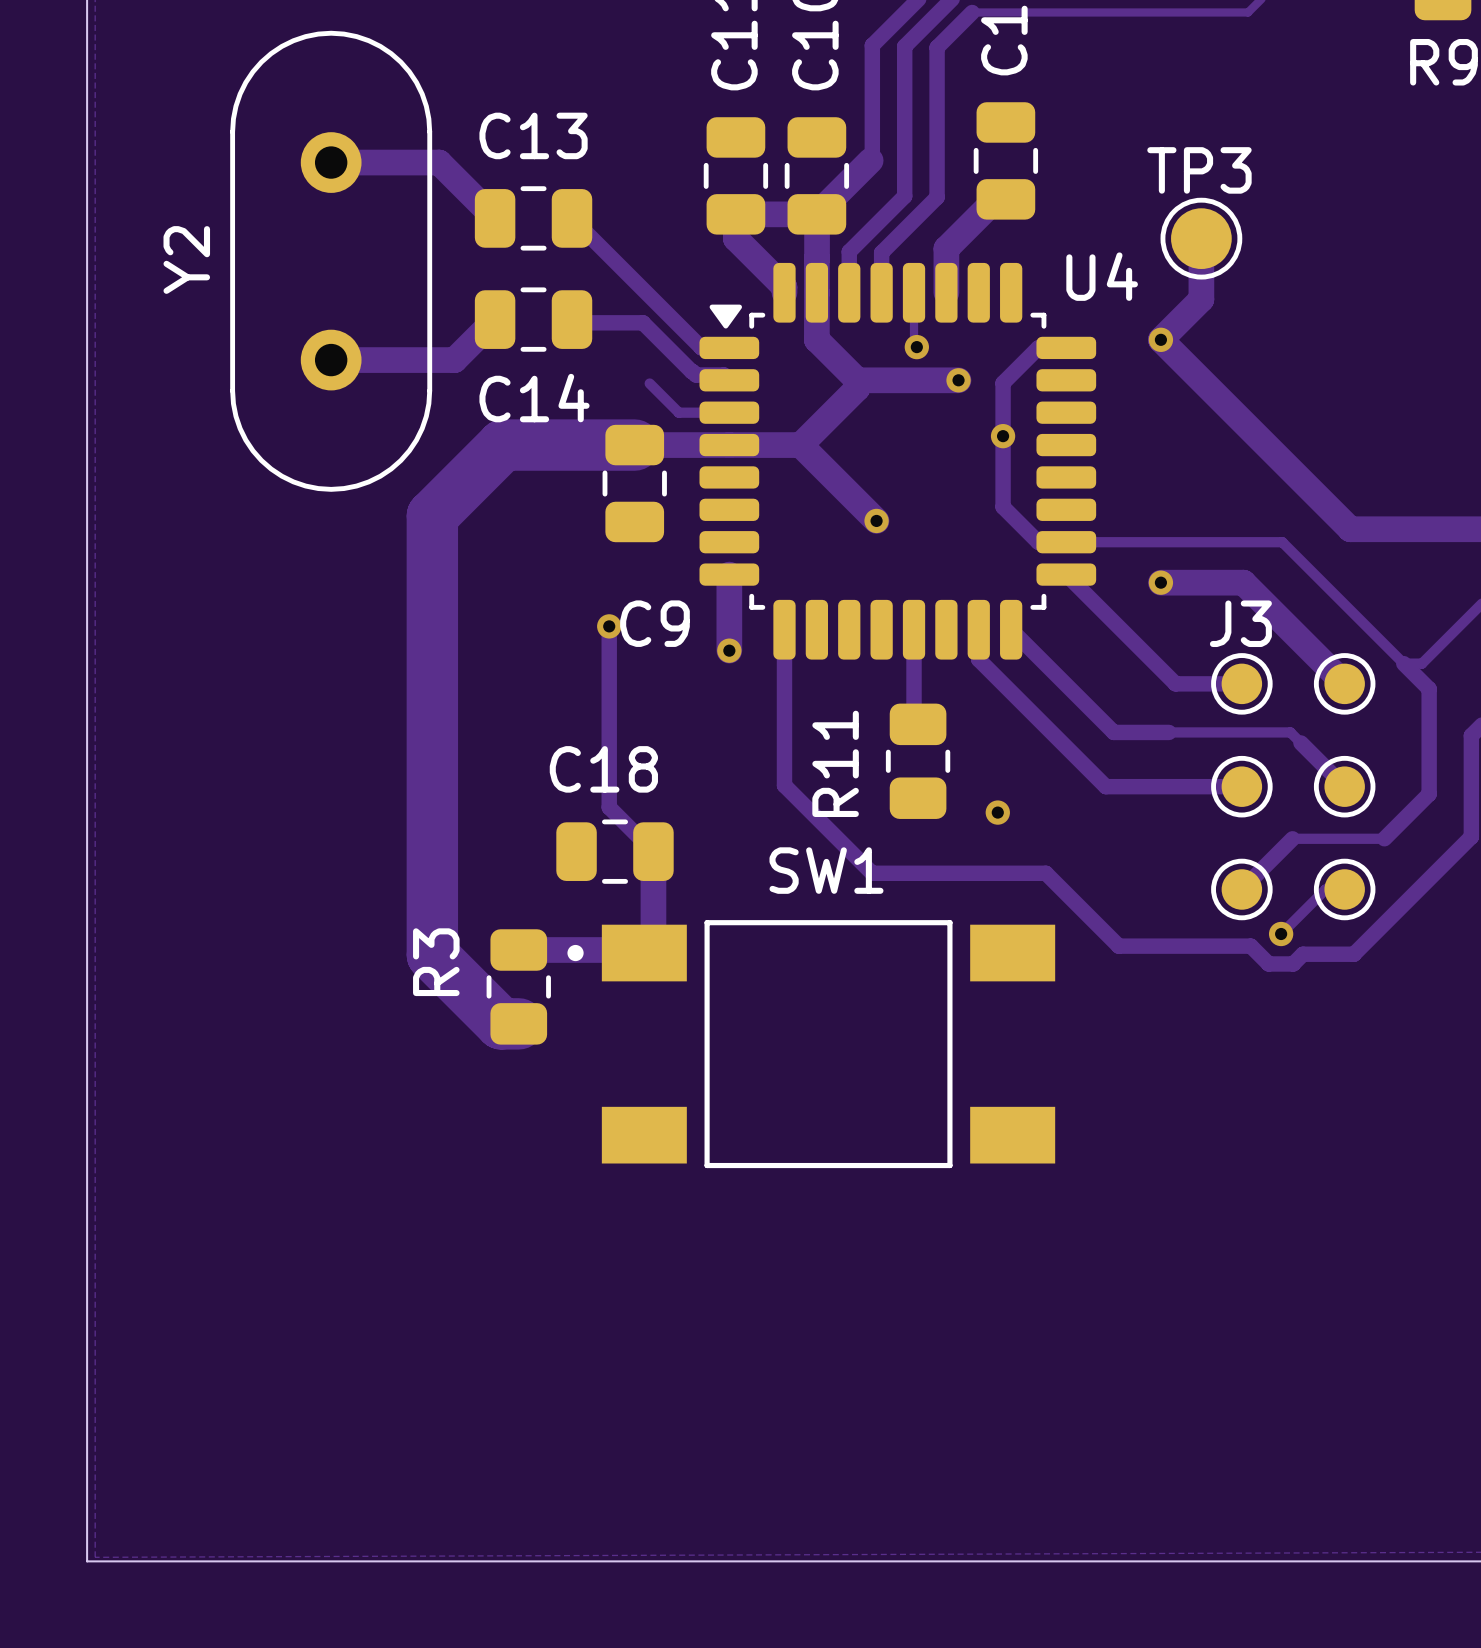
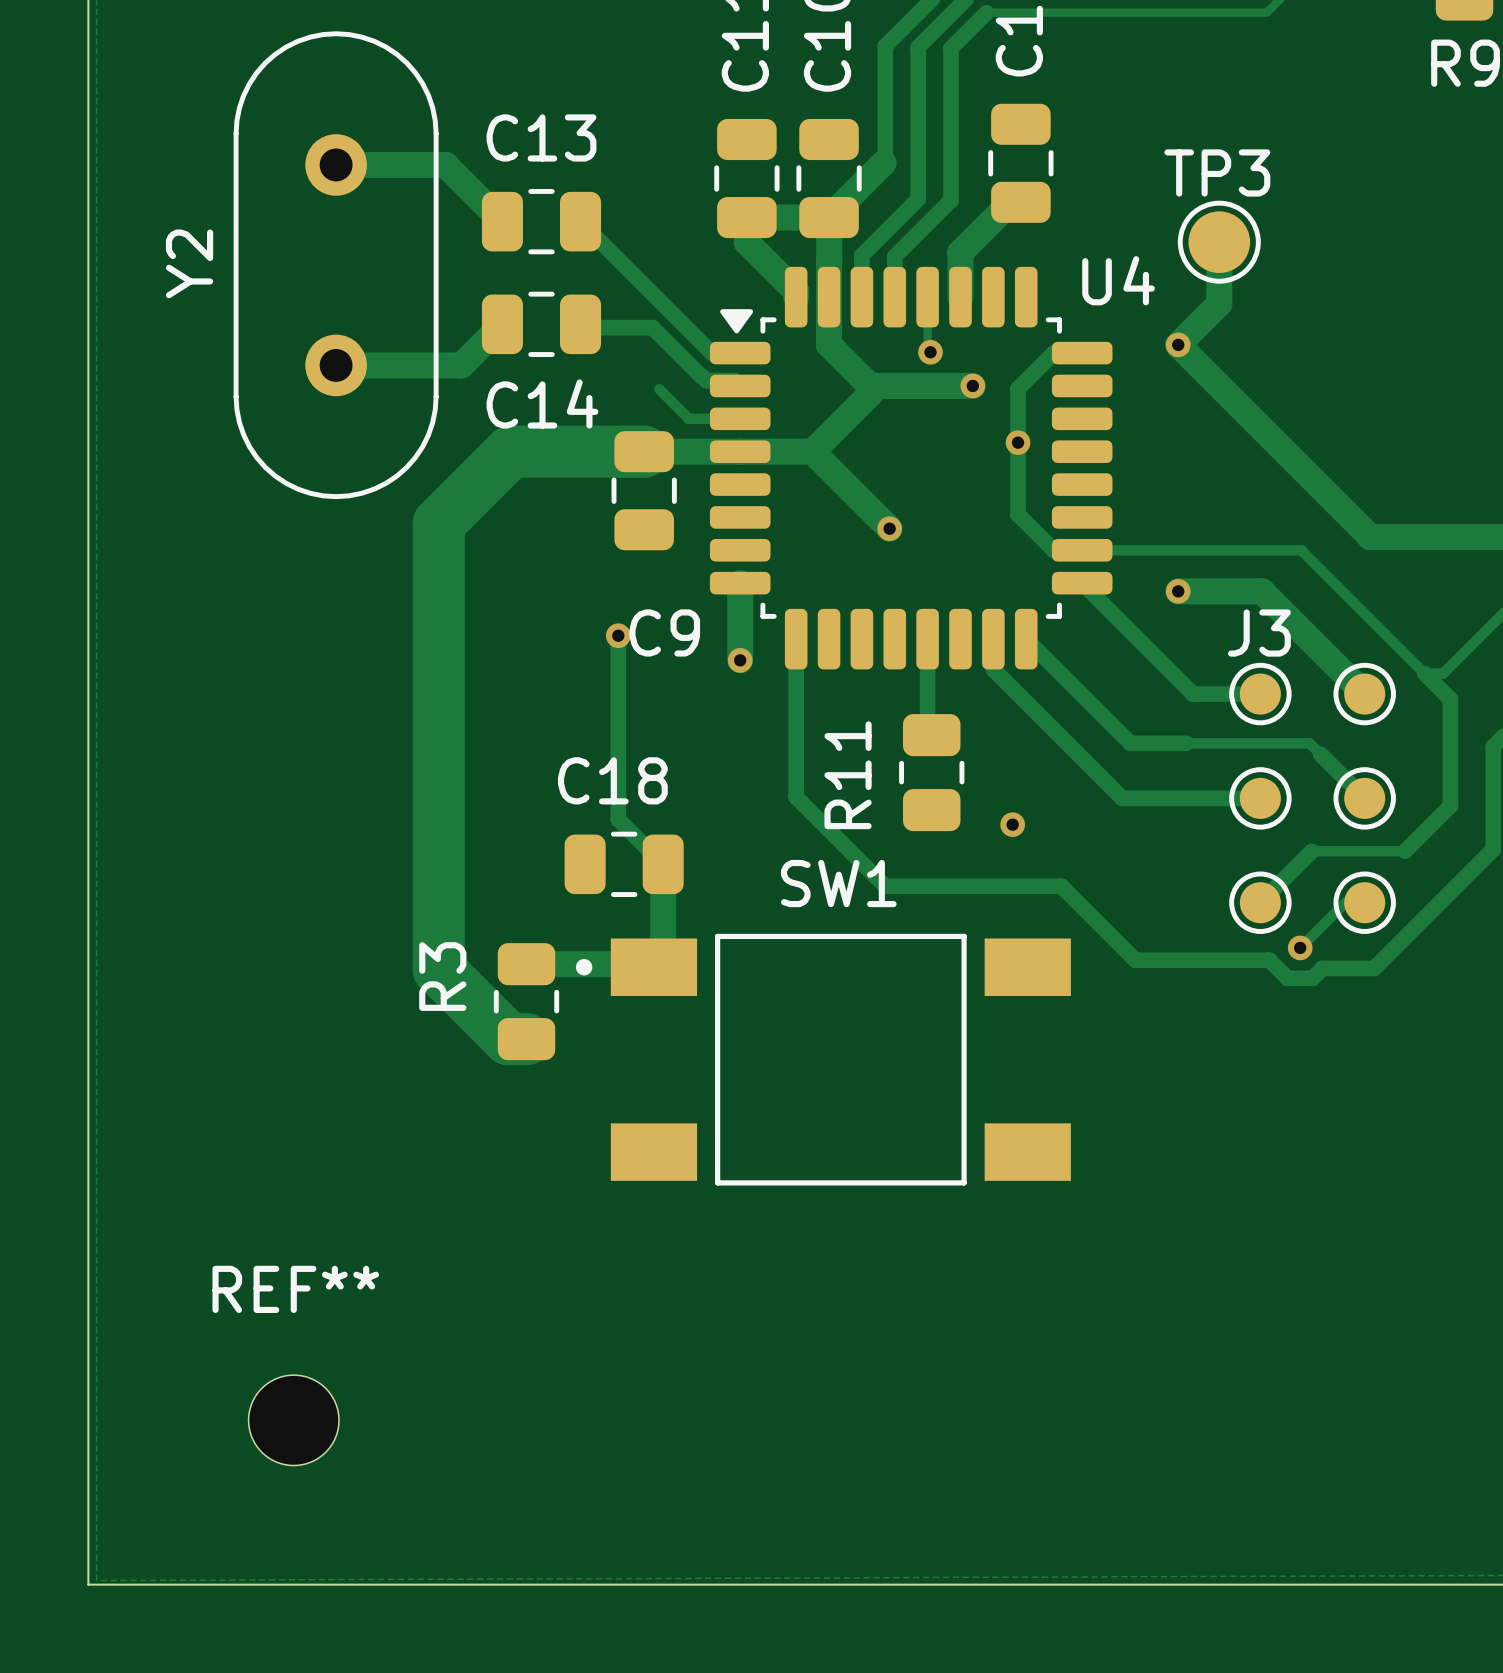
REF**: none -> (293, 1420)

